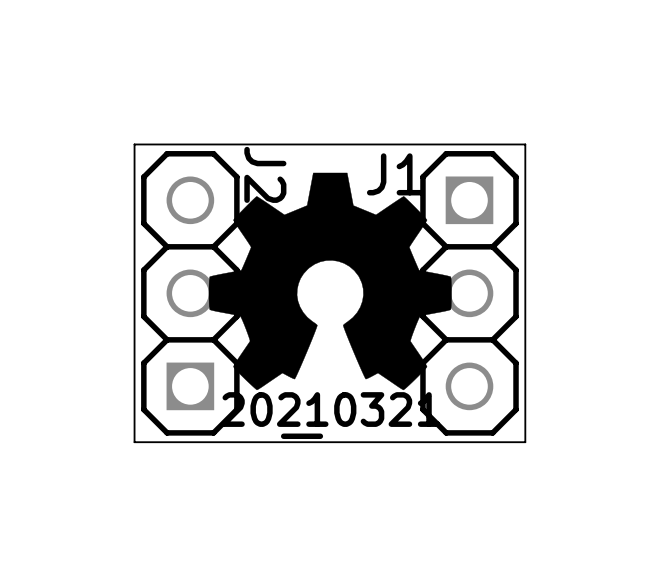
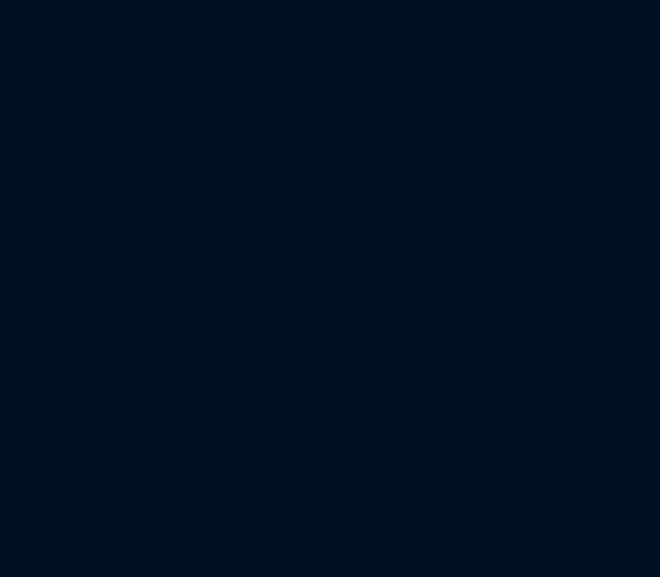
board edge: (525, 144) (525, 442) (134, 442) (134, 144) (525, 144) -> none
drawing: [208, 172, 452, 440] -> none
J2: (190, 293) -> none
J1: (469, 293) -> none

